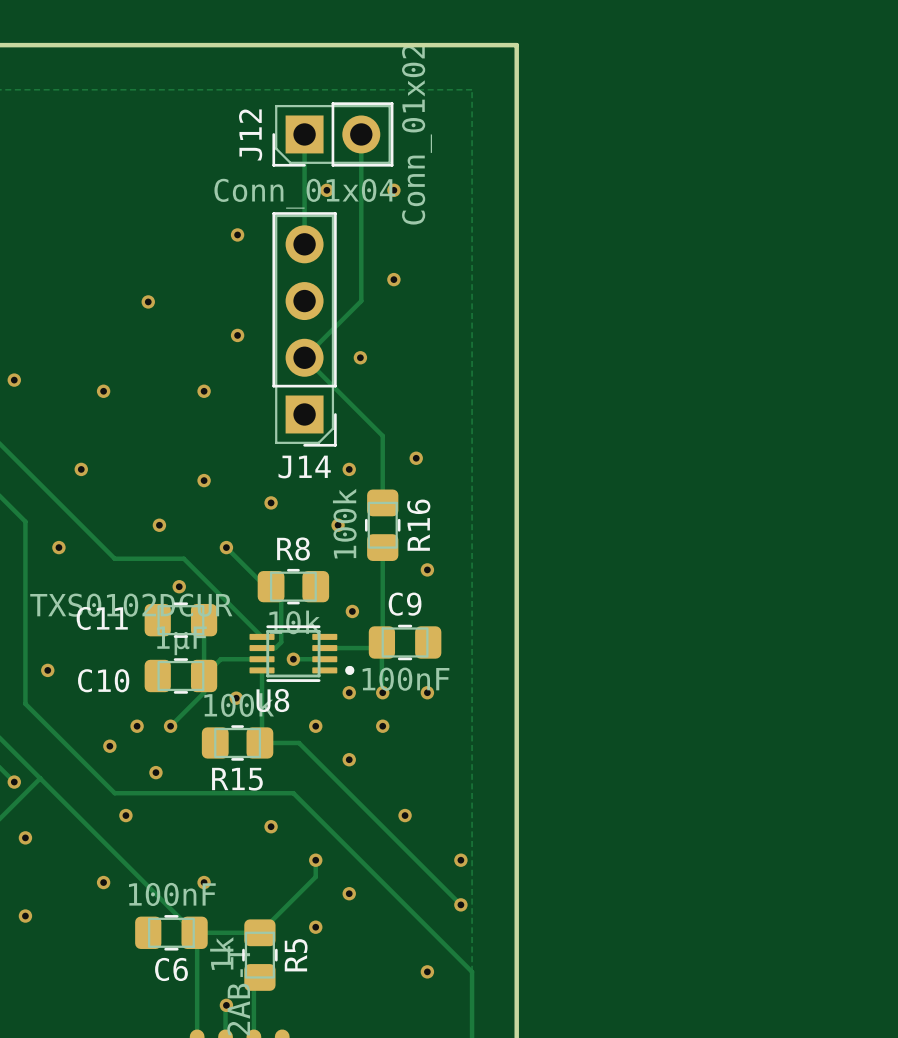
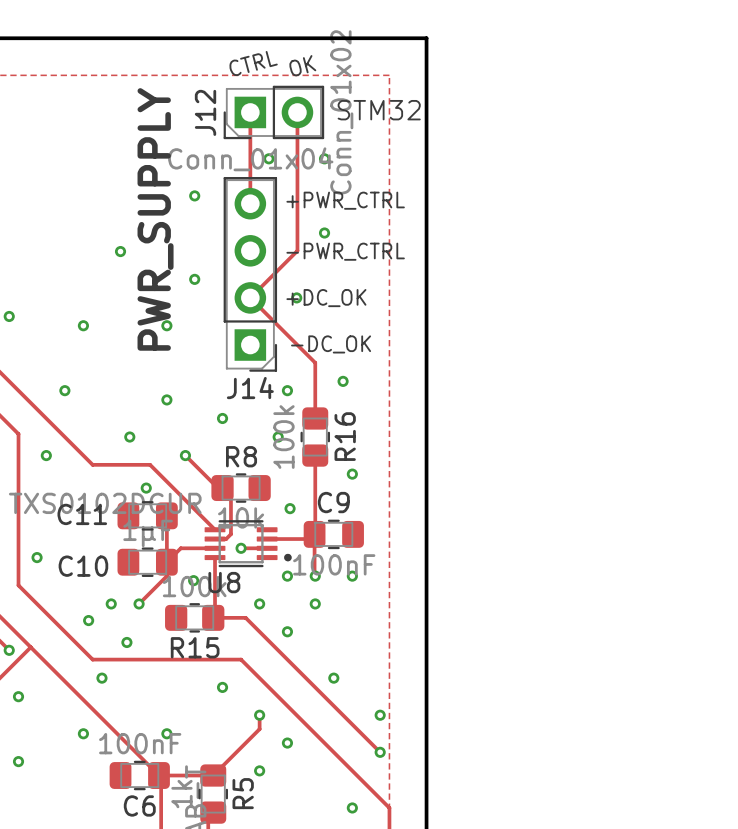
text: none -> CTRL (253, 63)
text: none -> OK (302, 65)
text: none -> STM32 (379, 110)
text: none -> PWR_SUPPLY (155, 219)
text: none -> +PWR_CTRL (345, 200)
text: none -> -PWR_CTRL (345, 251)
text: none -> +DC_OK (326, 298)
text: none -> -DC_OK (331, 344)

